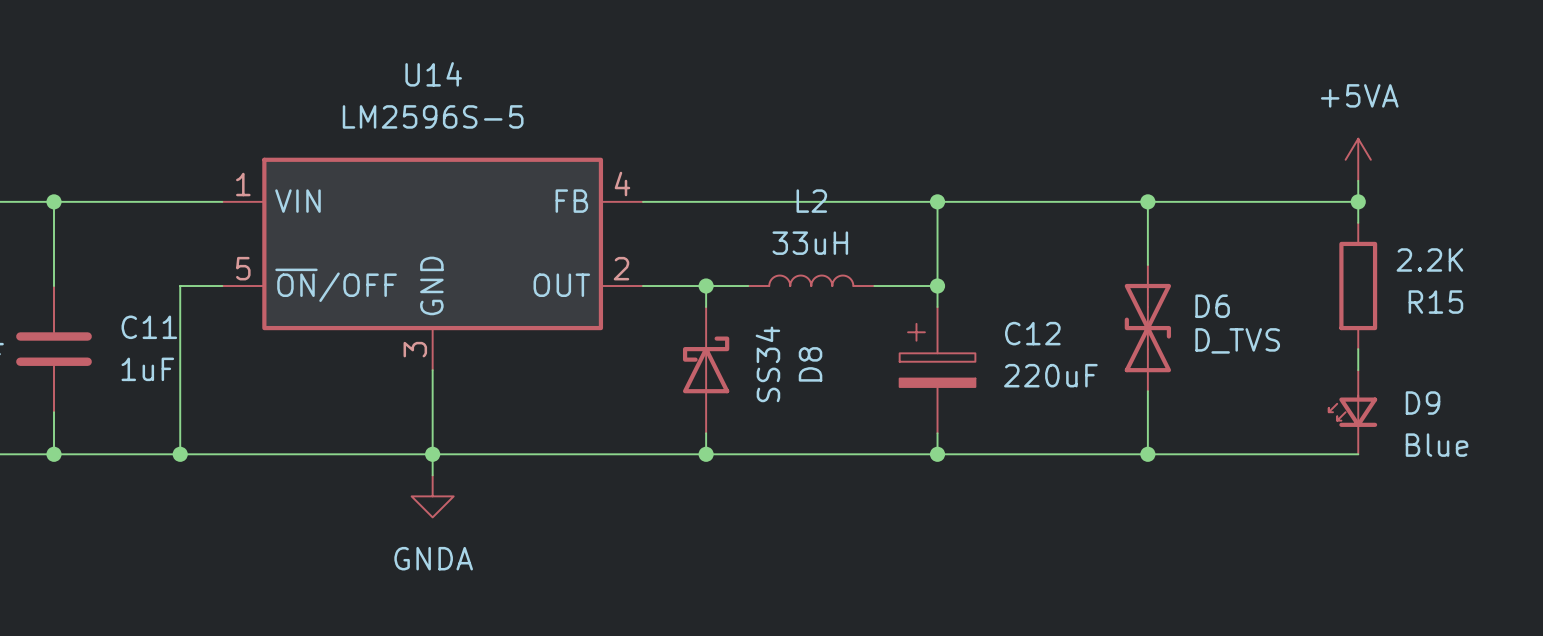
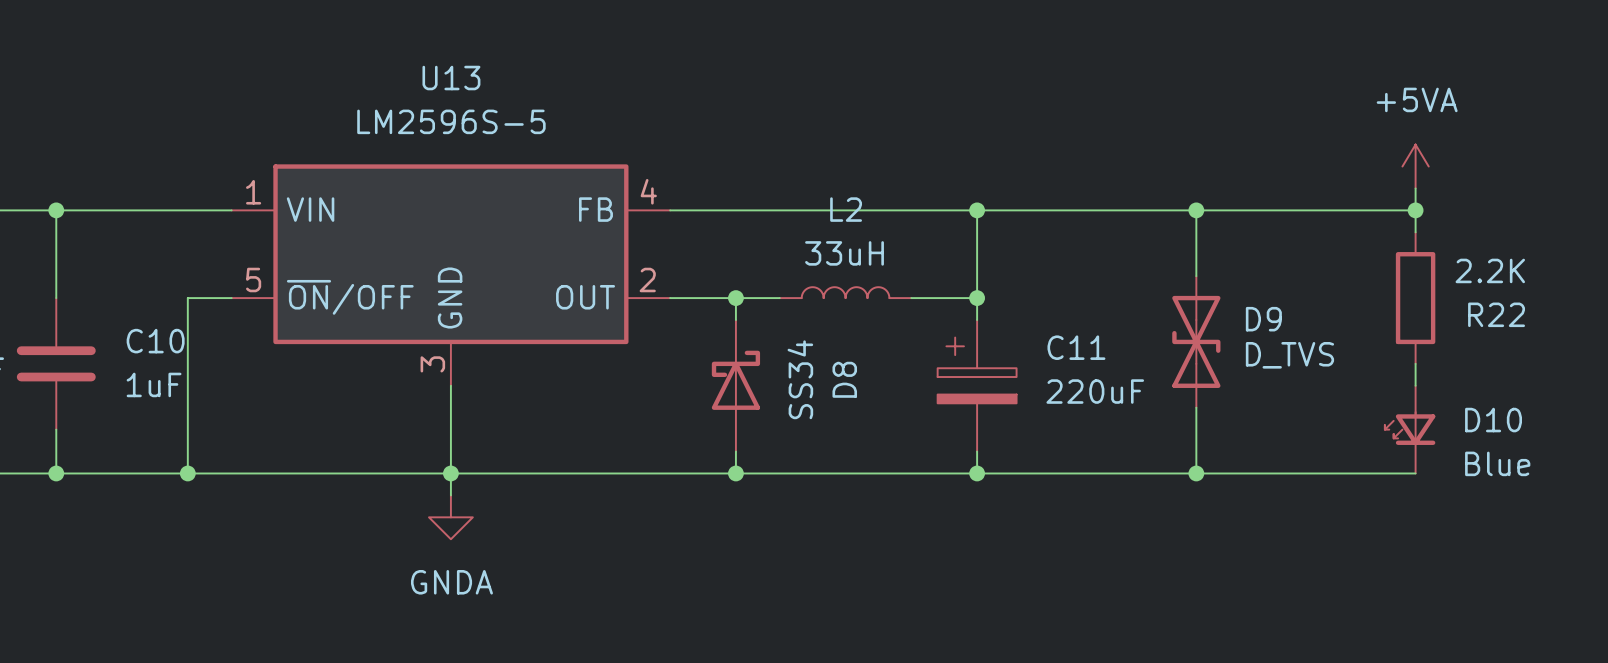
U14 name: U14 (433, 74) -> U13 (451, 78)
R15 name: R15 (1435, 302) -> R22 (1496, 314)
D6 name: D6 (1212, 306) -> D9 (1263, 319)
C11 name: C11 (149, 327) -> C10 (155, 341)
C12 name: C12 (1032, 333) -> C11 (1076, 347)
D9 name: D9 (1423, 403) -> D10 (1493, 420)

